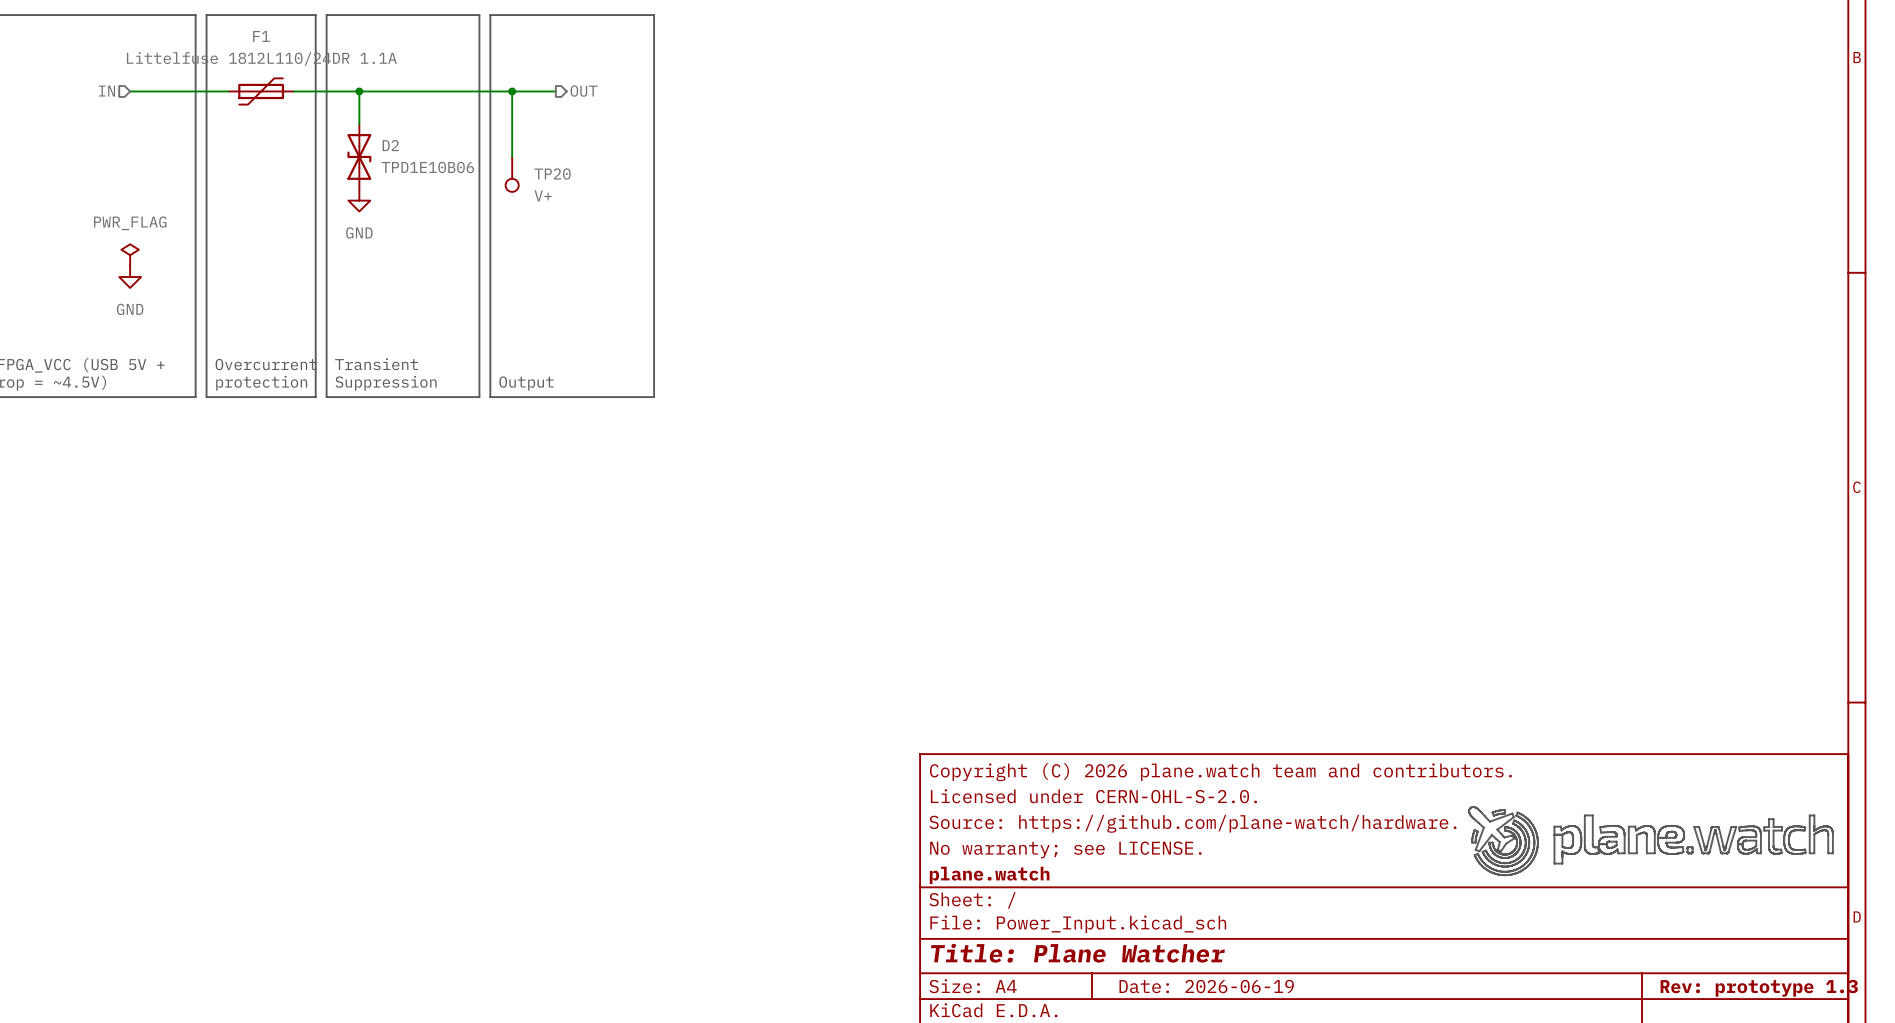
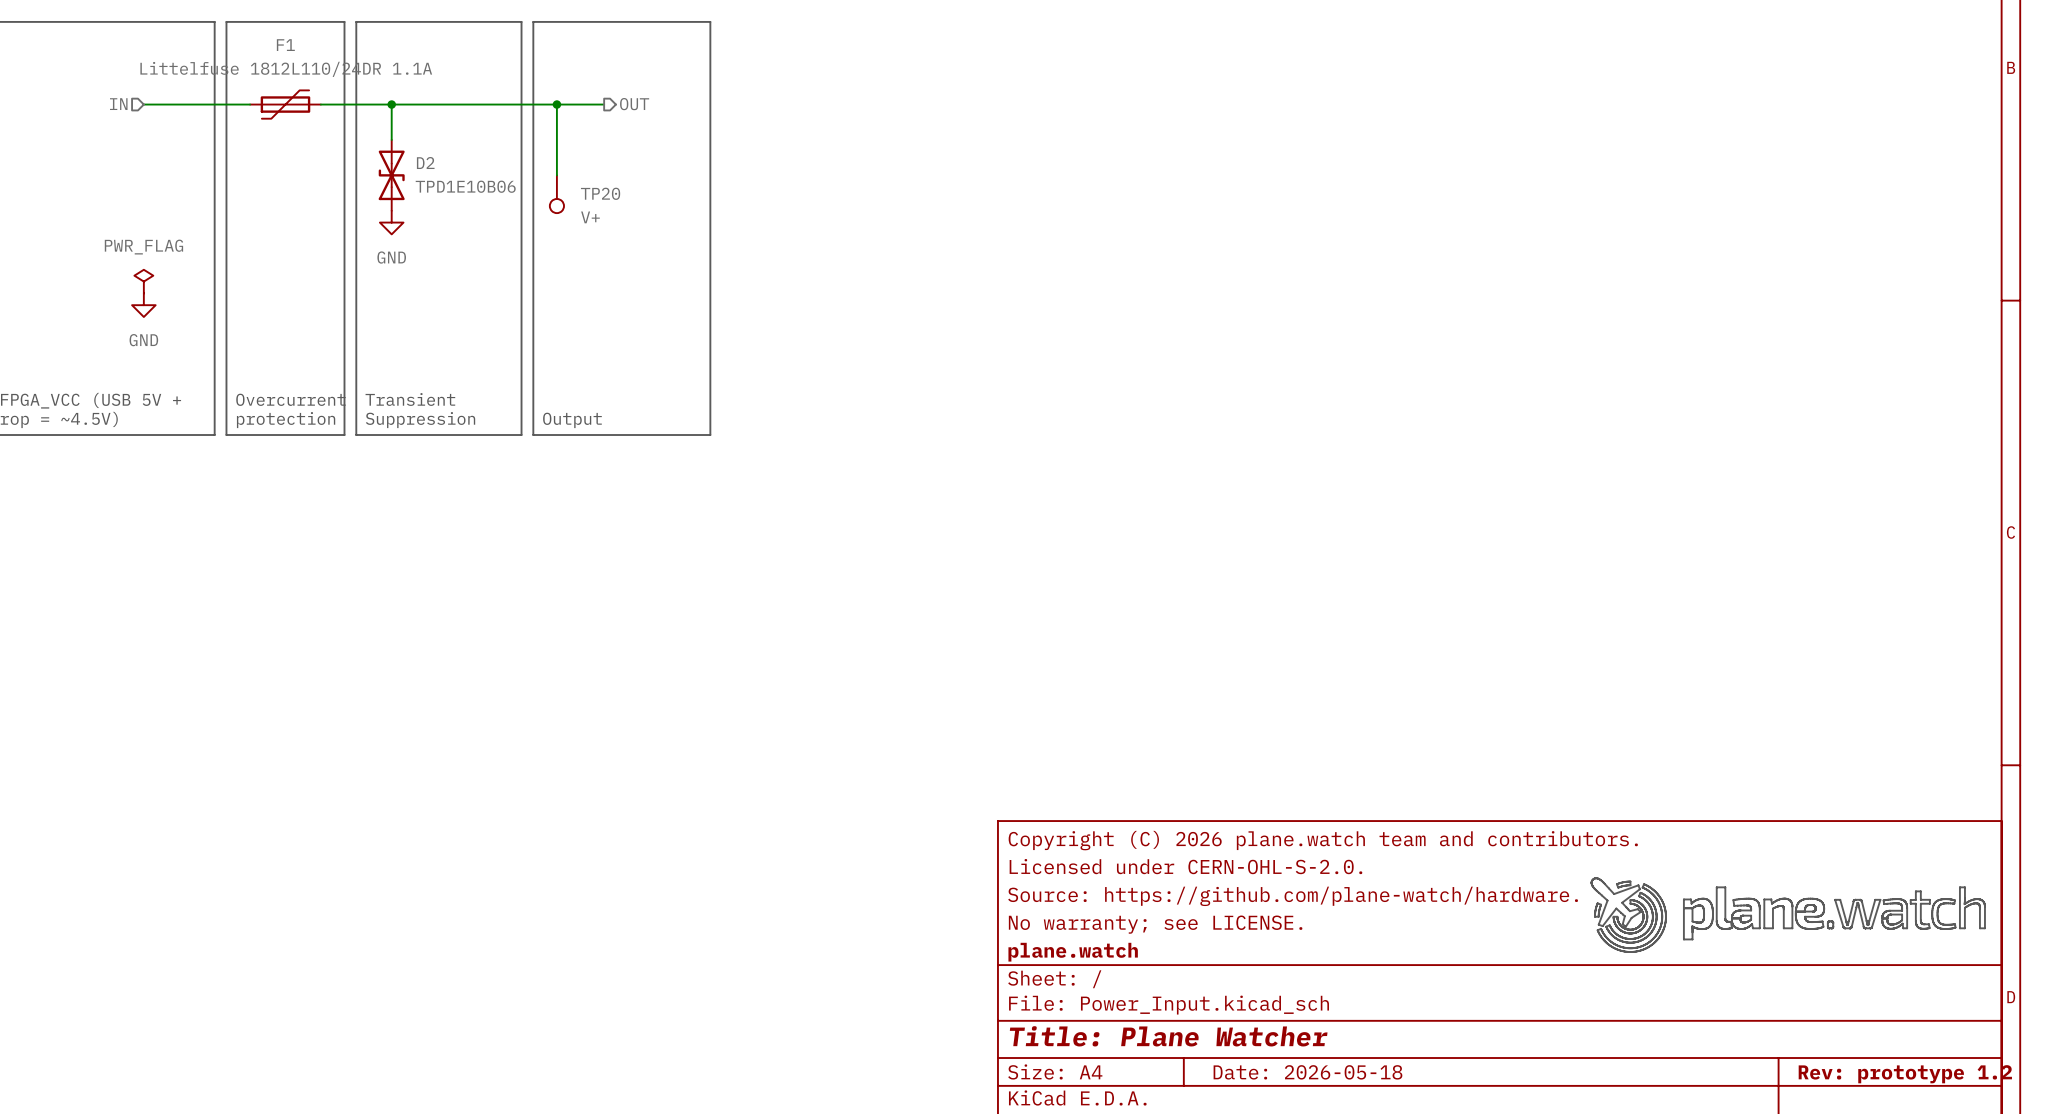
title block: Date: 2026-06-19 (1206, 986) -> Date: 2026-05-18 (1307, 1072)
title block: Rev: prototype 1.3 (1759, 988) -> Rev: prototype 1.2 (1905, 1074)

